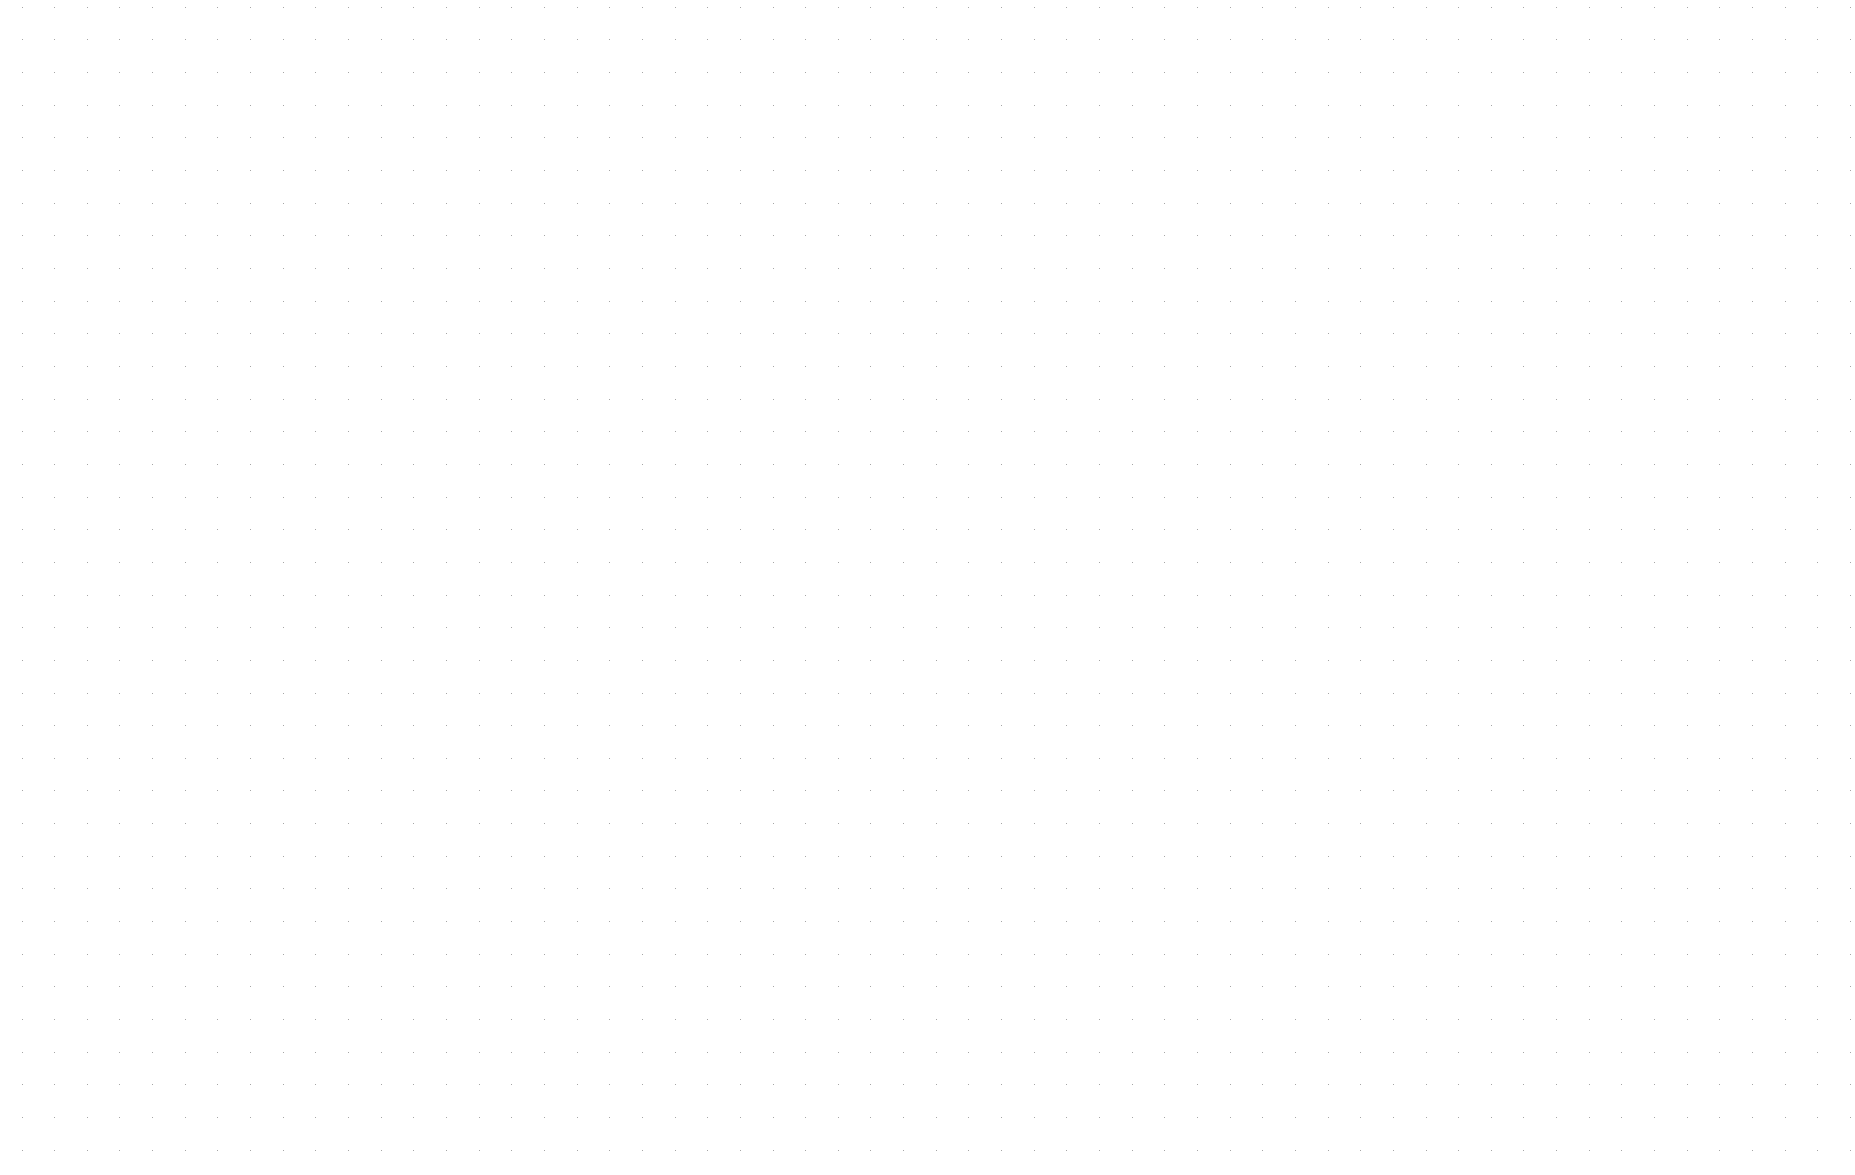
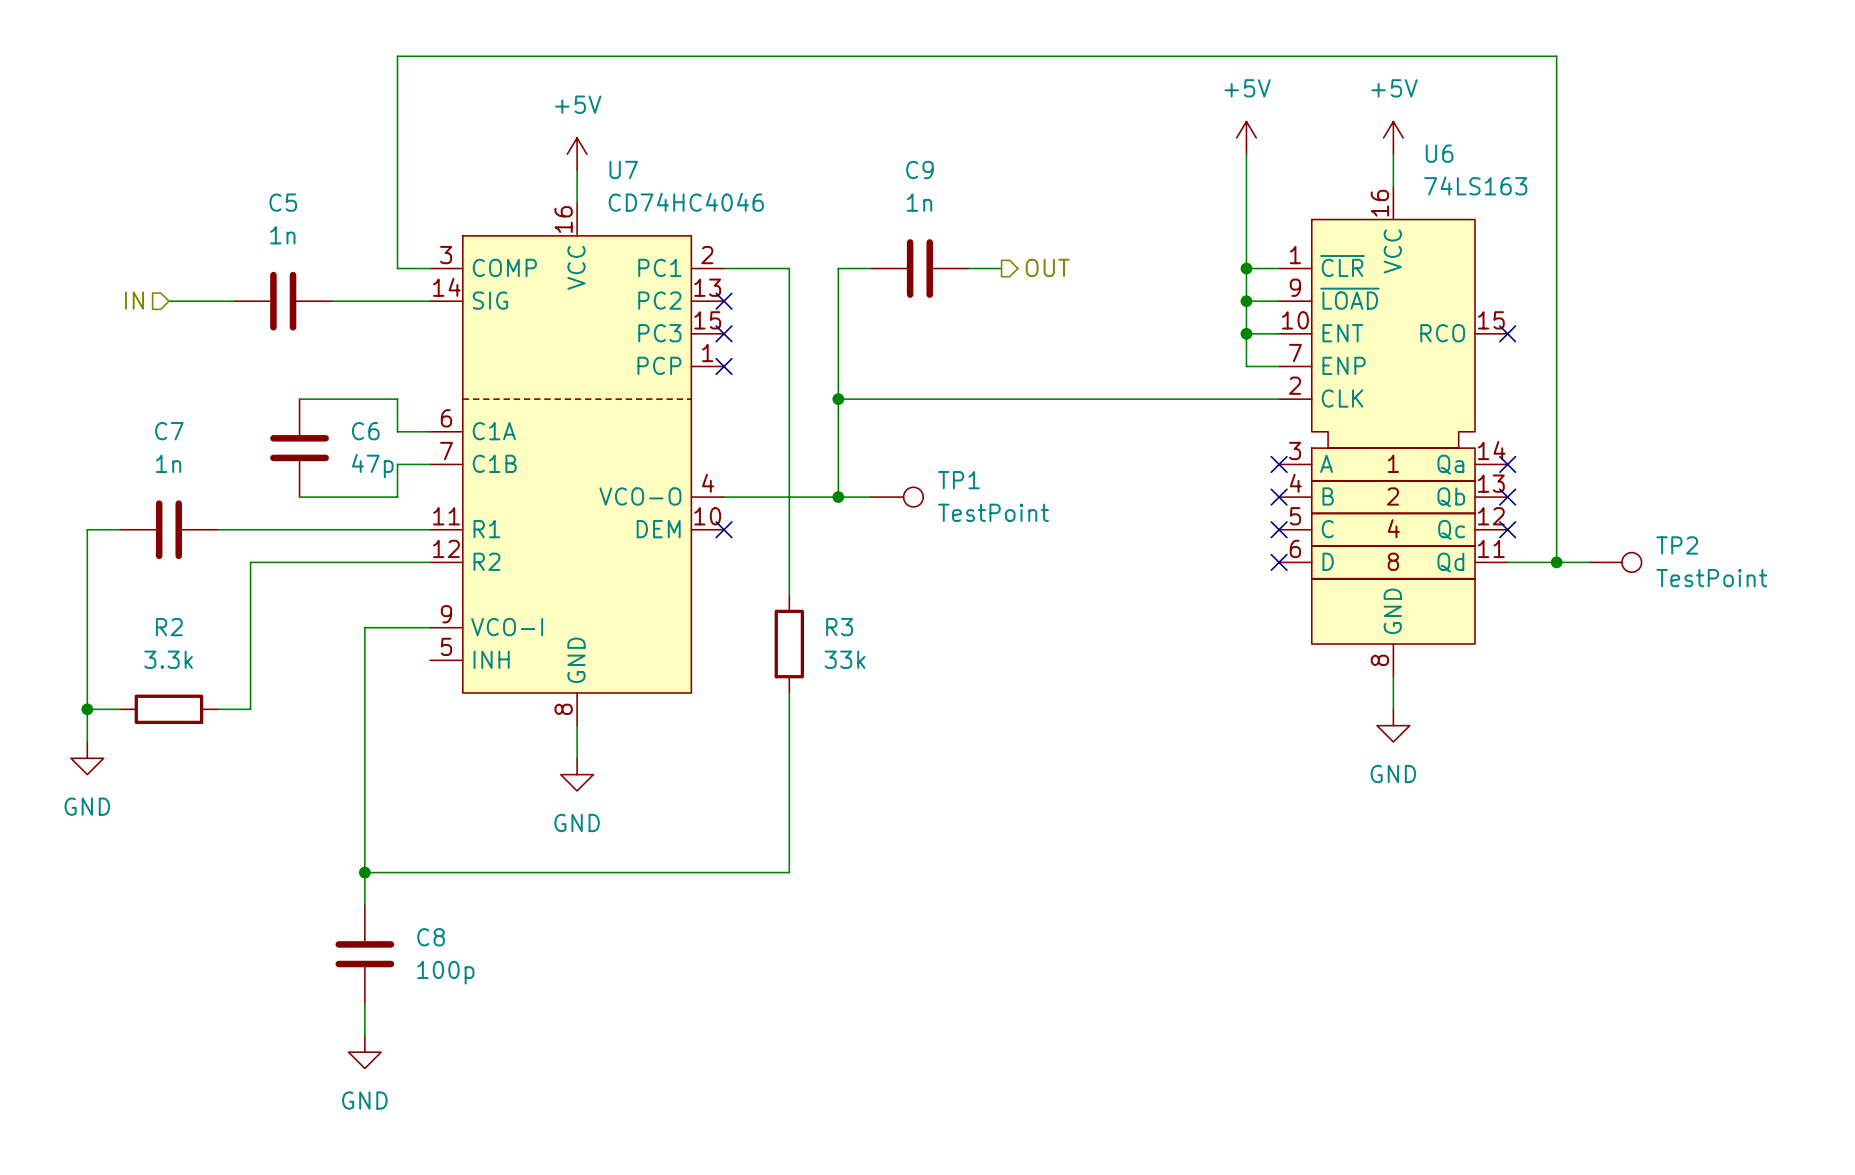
power symbol: none -> +5V (1246, 137)
power symbol: none -> +5V (1393, 137)
power symbol: none -> +5V (577, 154)
wire: none -> (1246, 154) (1246, 366) (1279, 366)
wire: none -> (1393, 154) (1393, 186)
wire: none -> (577, 170) (577, 203)
hierarchical label: none -> OUT (1047, 267)
wire: none -> (430, 268) (397, 268) (397, 56) (1556, 56) (1556, 562)
wire: none -> (724, 268) (789, 268) (789, 595)
wire: none -> (870, 268) (838, 268) (838, 497)
C9: none -> 1n (919, 268)
wire: none -> (968, 268) (1001, 268)
wire: none -> (1246, 268) (1279, 268)
junction: none -> (1246, 268)
hierarchical label: none -> IN (134, 300)
wire: none -> (168, 301) (234, 301)
C5: none -> 1n (283, 301)
wire: none -> (332, 301) (430, 301)
no-connect mark: none -> (724, 301)
wire: none -> (1246, 301) (1279, 301)
junction: none -> (1246, 301)
no-connect mark: none -> (724, 333)
wire: none -> (1246, 333) (1279, 333)
junction: none -> (1246, 333)
no-connect mark: none -> (1507, 333)
no-connect mark: none -> (724, 366)
wire: none -> (299, 399) (397, 399) (397, 431) (430, 431)
wire: none -> (838, 399) (1279, 399)
junction: none -> (838, 399)
U6: none -> 74LS163 (1393, 431)
C6: none -> 47p (299, 448)
wire: none -> (430, 464) (397, 464) (397, 497) (299, 497)
U7: none -> CD74HC4046 (577, 464)
no-connect mark: none -> (1279, 464)
no-connect mark: none -> (1507, 464)
wire: none -> (724, 497) (870, 497)
junction: none -> (838, 497)
TP1: none -> TestPoint (897, 497)
no-connect mark: none -> (1279, 497)
no-connect mark: none -> (1507, 497)
wire: none -> (119, 529) (87, 529) (87, 741)
C7: none -> 1n (168, 529)
wire: none -> (217, 529) (430, 529)
no-connect mark: none -> (724, 529)
no-connect mark: none -> (1279, 529)
no-connect mark: none -> (1507, 529)
wire: none -> (430, 562) (250, 562) (250, 709) (217, 709)
no-connect mark: none -> (1279, 562)
wire: none -> (1507, 562) (1589, 562)
junction: none -> (1556, 562)
TP2: none -> TestPoint (1615, 562)
wire: none -> (430, 627) (364, 627) (364, 905)
R3: none -> 33k (789, 644)
wire: none -> (1393, 676) (1393, 709)
wire: none -> (789, 693) (789, 872) (364, 872)
wire: none -> (87, 709) (119, 709)
junction: none -> (87, 709)
R2: none -> 3.3k (168, 709)
wire: none -> (577, 725) (577, 758)
power symbol: none -> GND (1393, 725)
power symbol: none -> GND (87, 758)
power symbol: none -> GND (577, 774)
junction: none -> (364, 872)
C8: none -> 100p (364, 954)
wire: none -> (364, 1003) (364, 1035)
power symbol: none -> GND (364, 1052)

